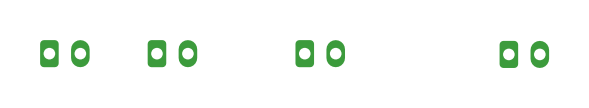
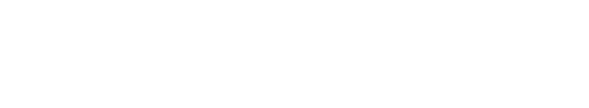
part: (64, 53) -> none
part: (172, 53) -> none
part: (320, 53) -> none
part: (524, 54) -> none

